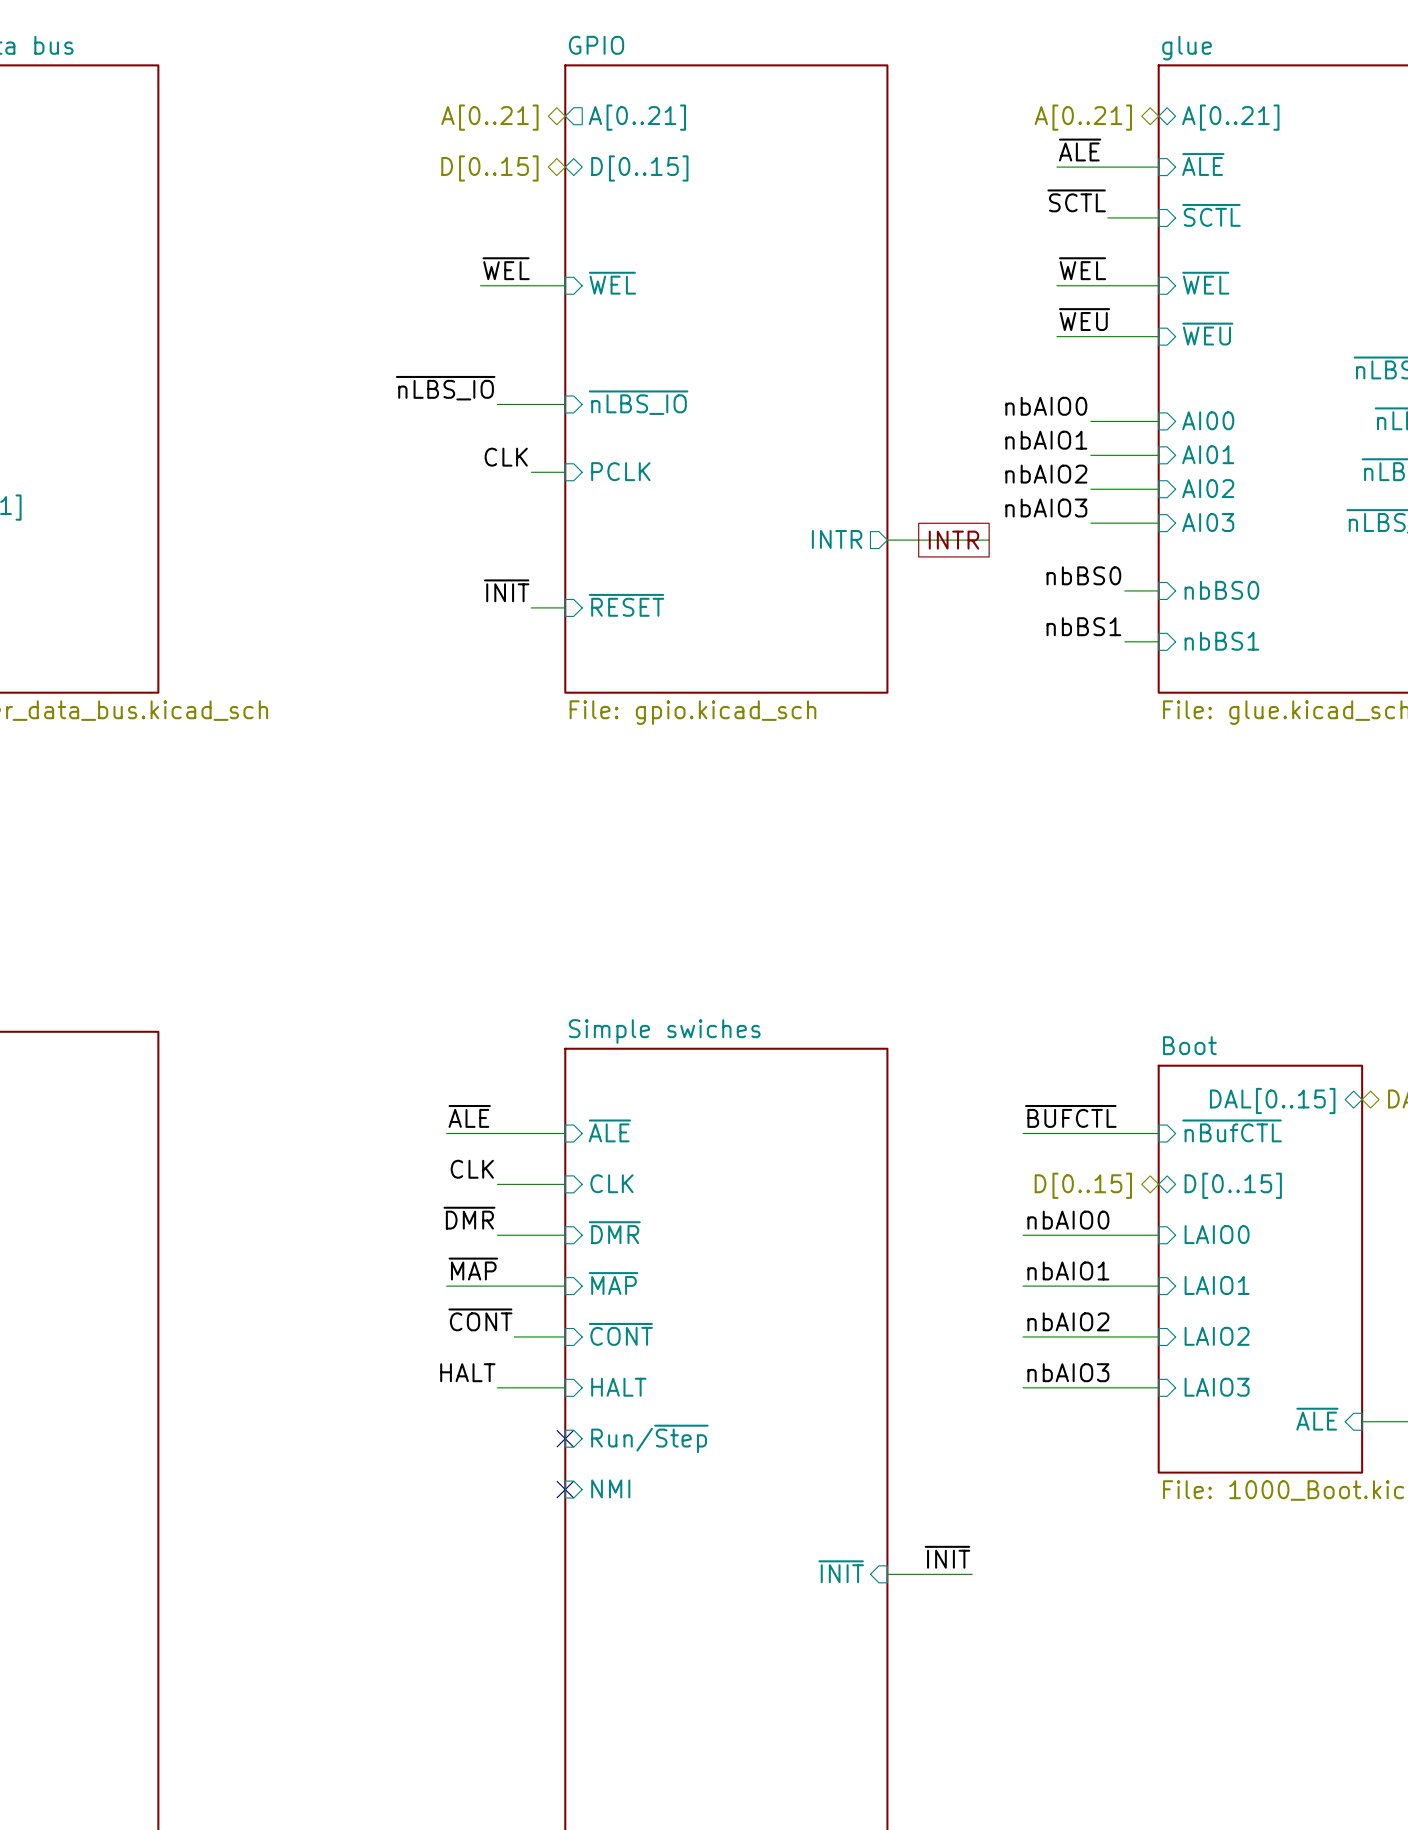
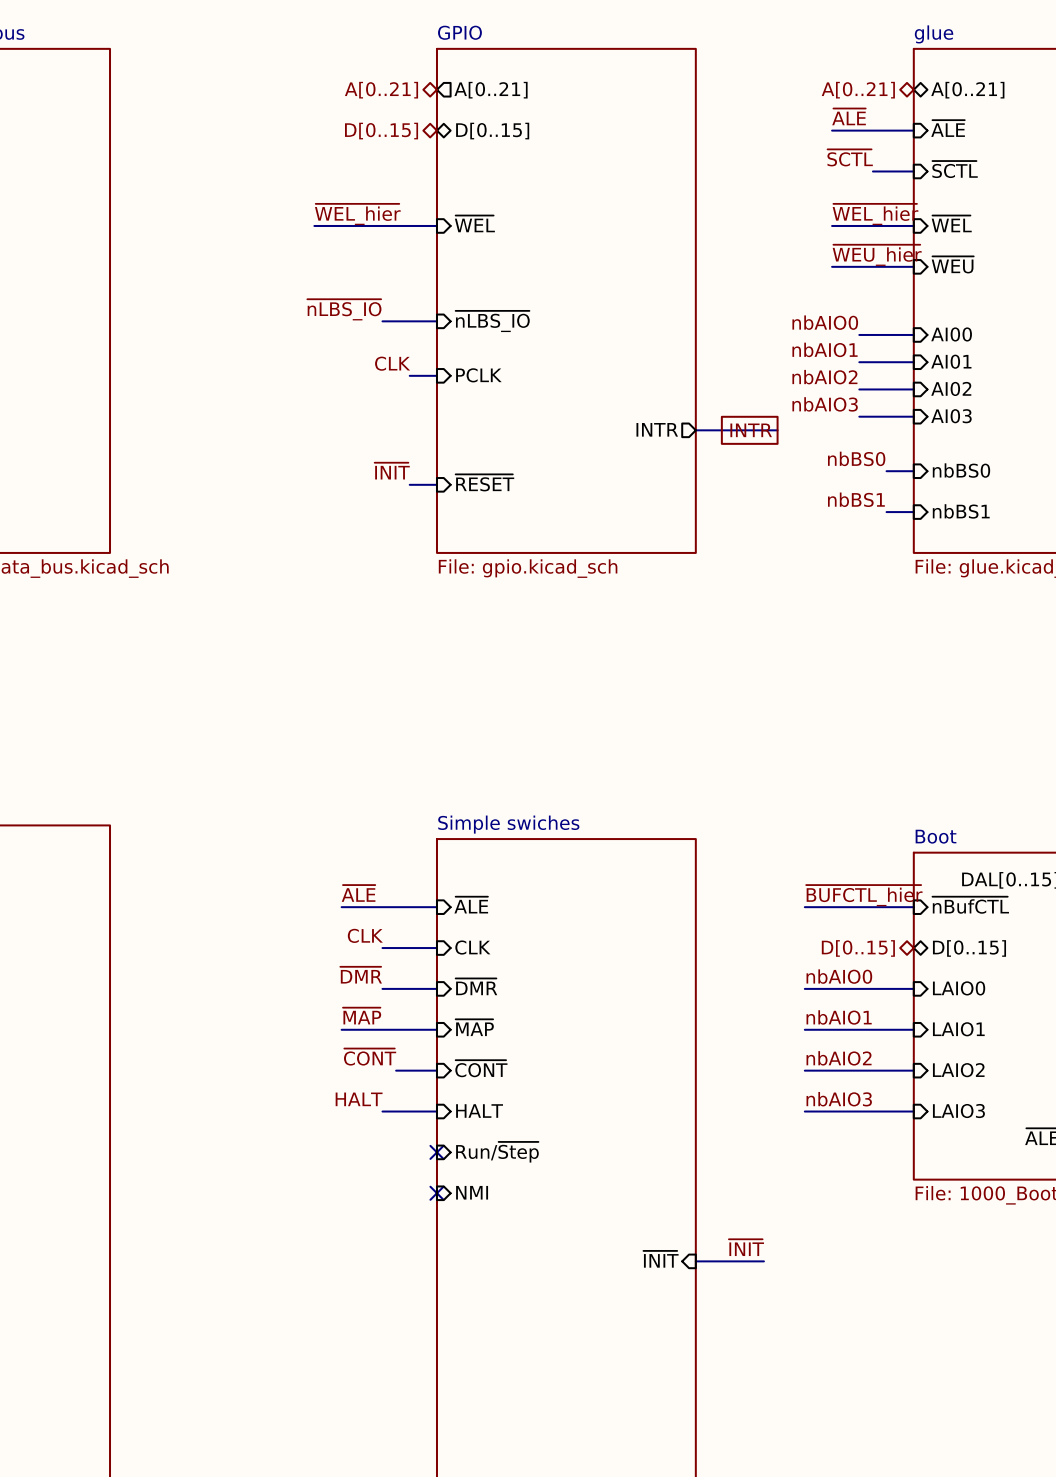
label: ~{WEL} (506, 268) -> ~{WEL_hier} (357, 214)
label: ~{WEL} (1082, 268) -> ~{WEL_hier} (875, 214)
wire: none -> (314, 225) (368, 225)
label: ~{WEU} (1084, 319) -> ~{WEU_hier} (877, 255)
label: ~{BUFCTL} (1070, 1116) -> ~{BUFCTL_hier} (864, 895)

